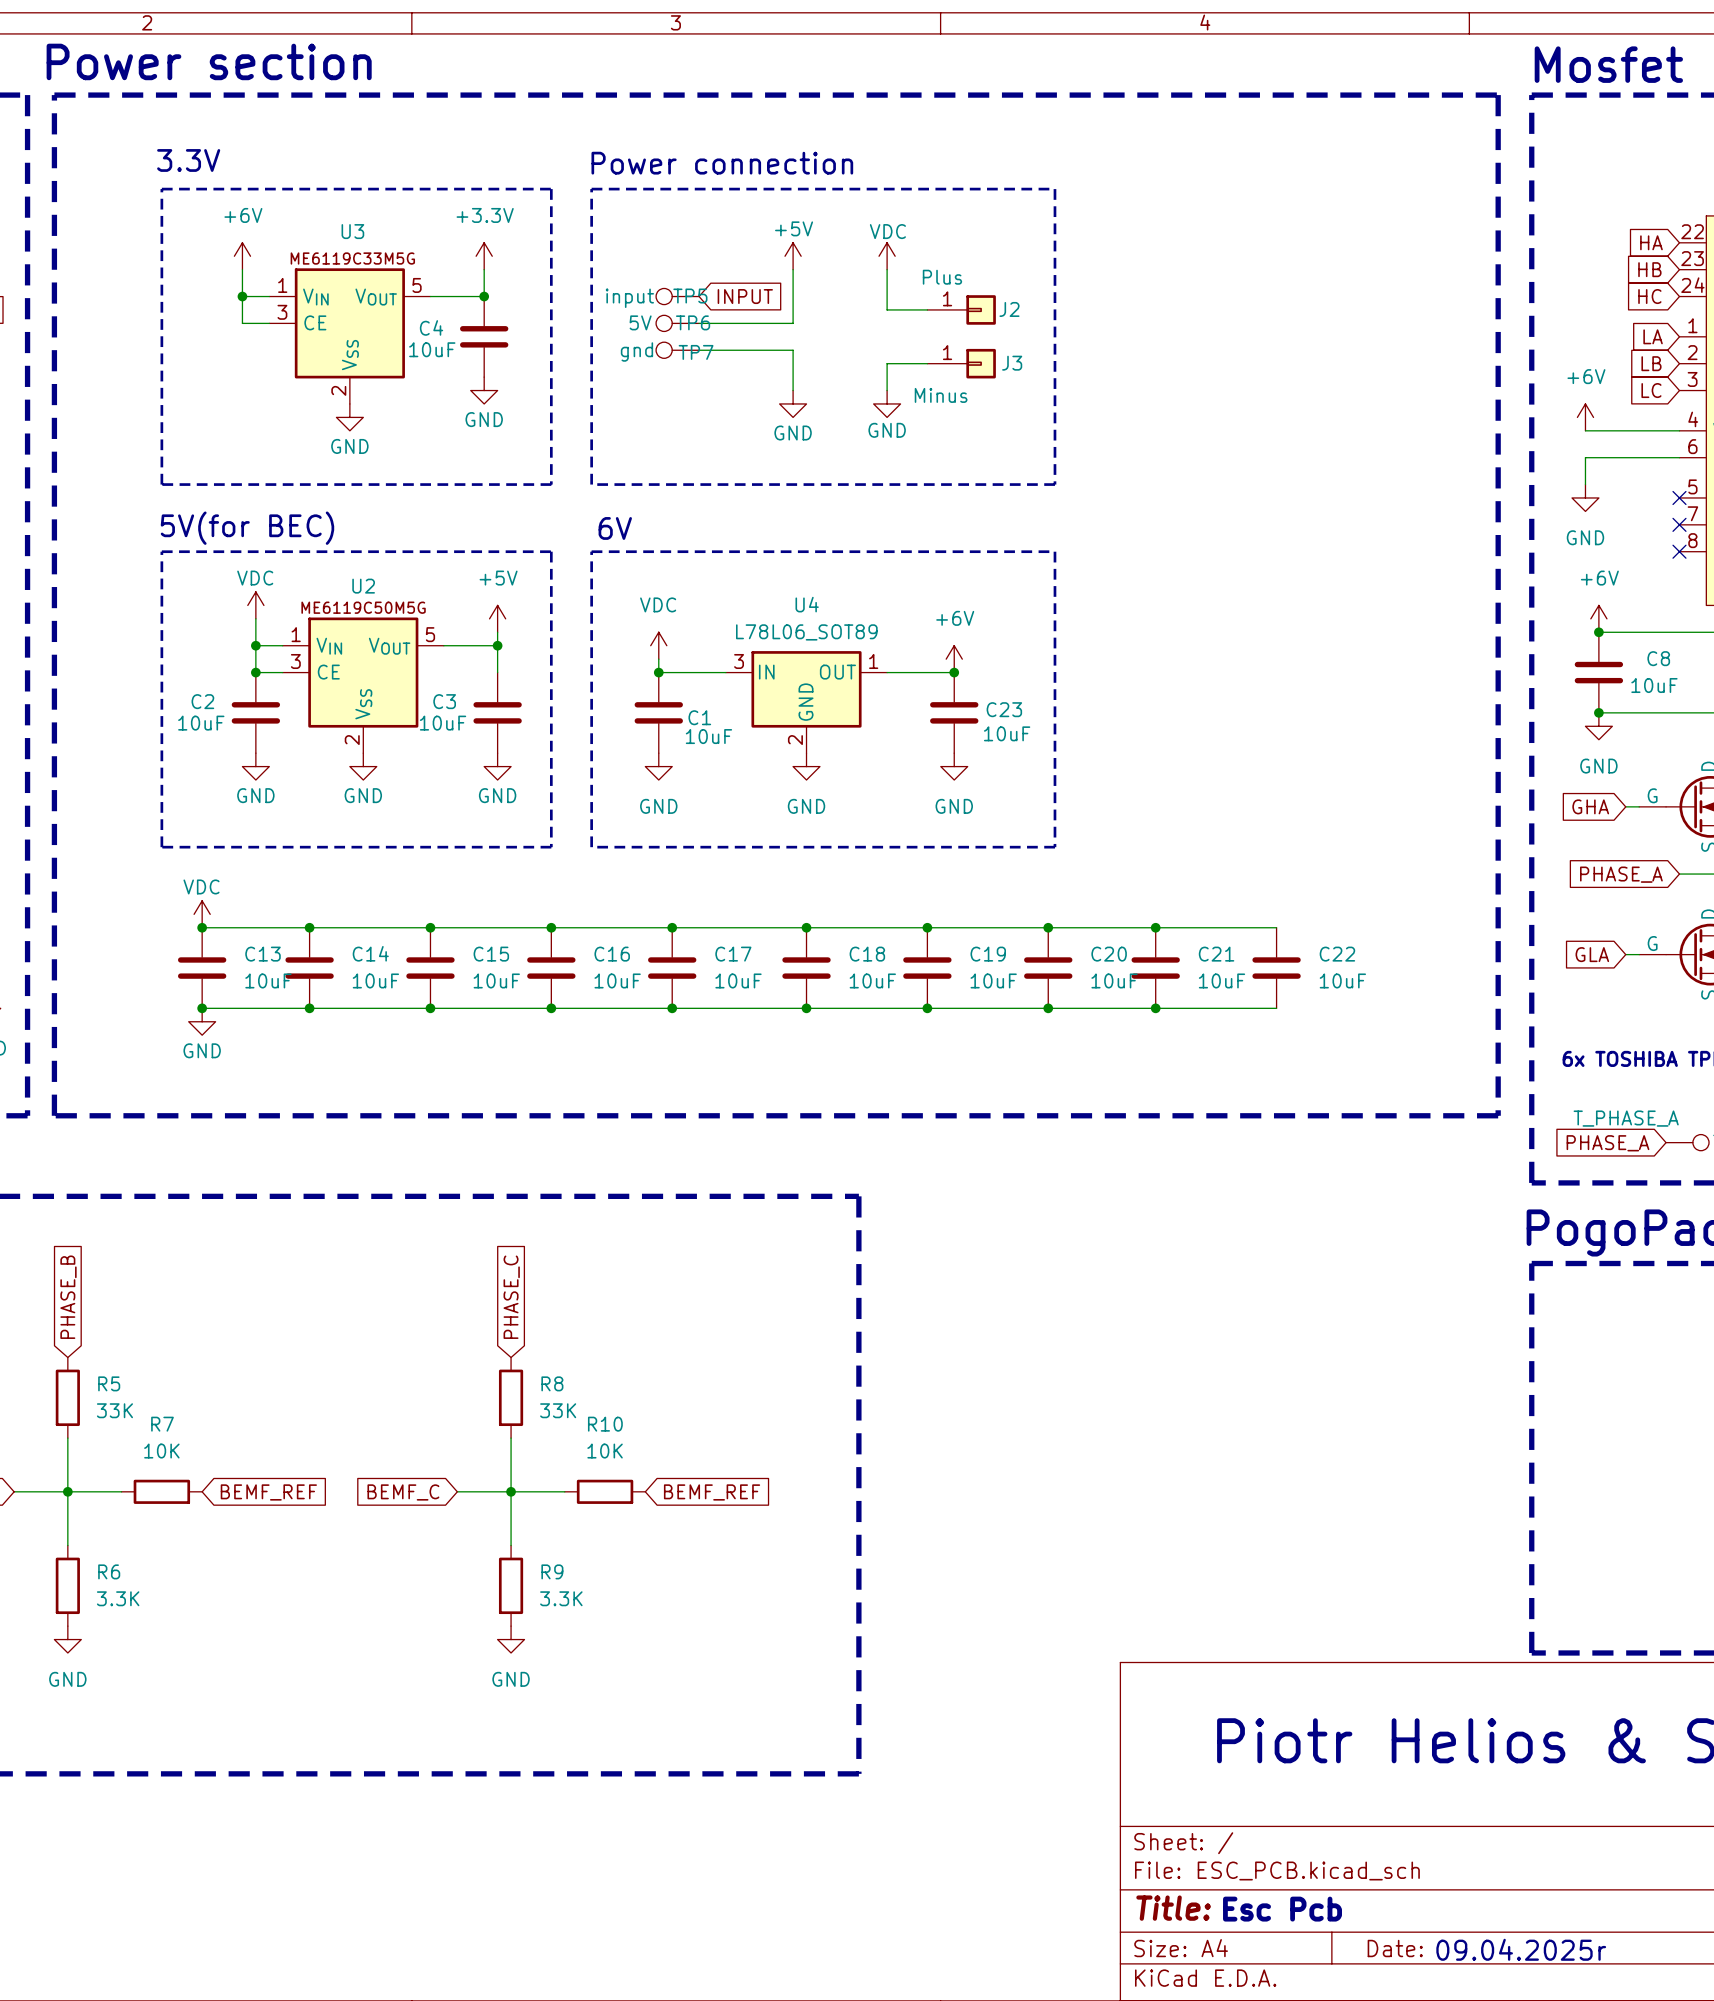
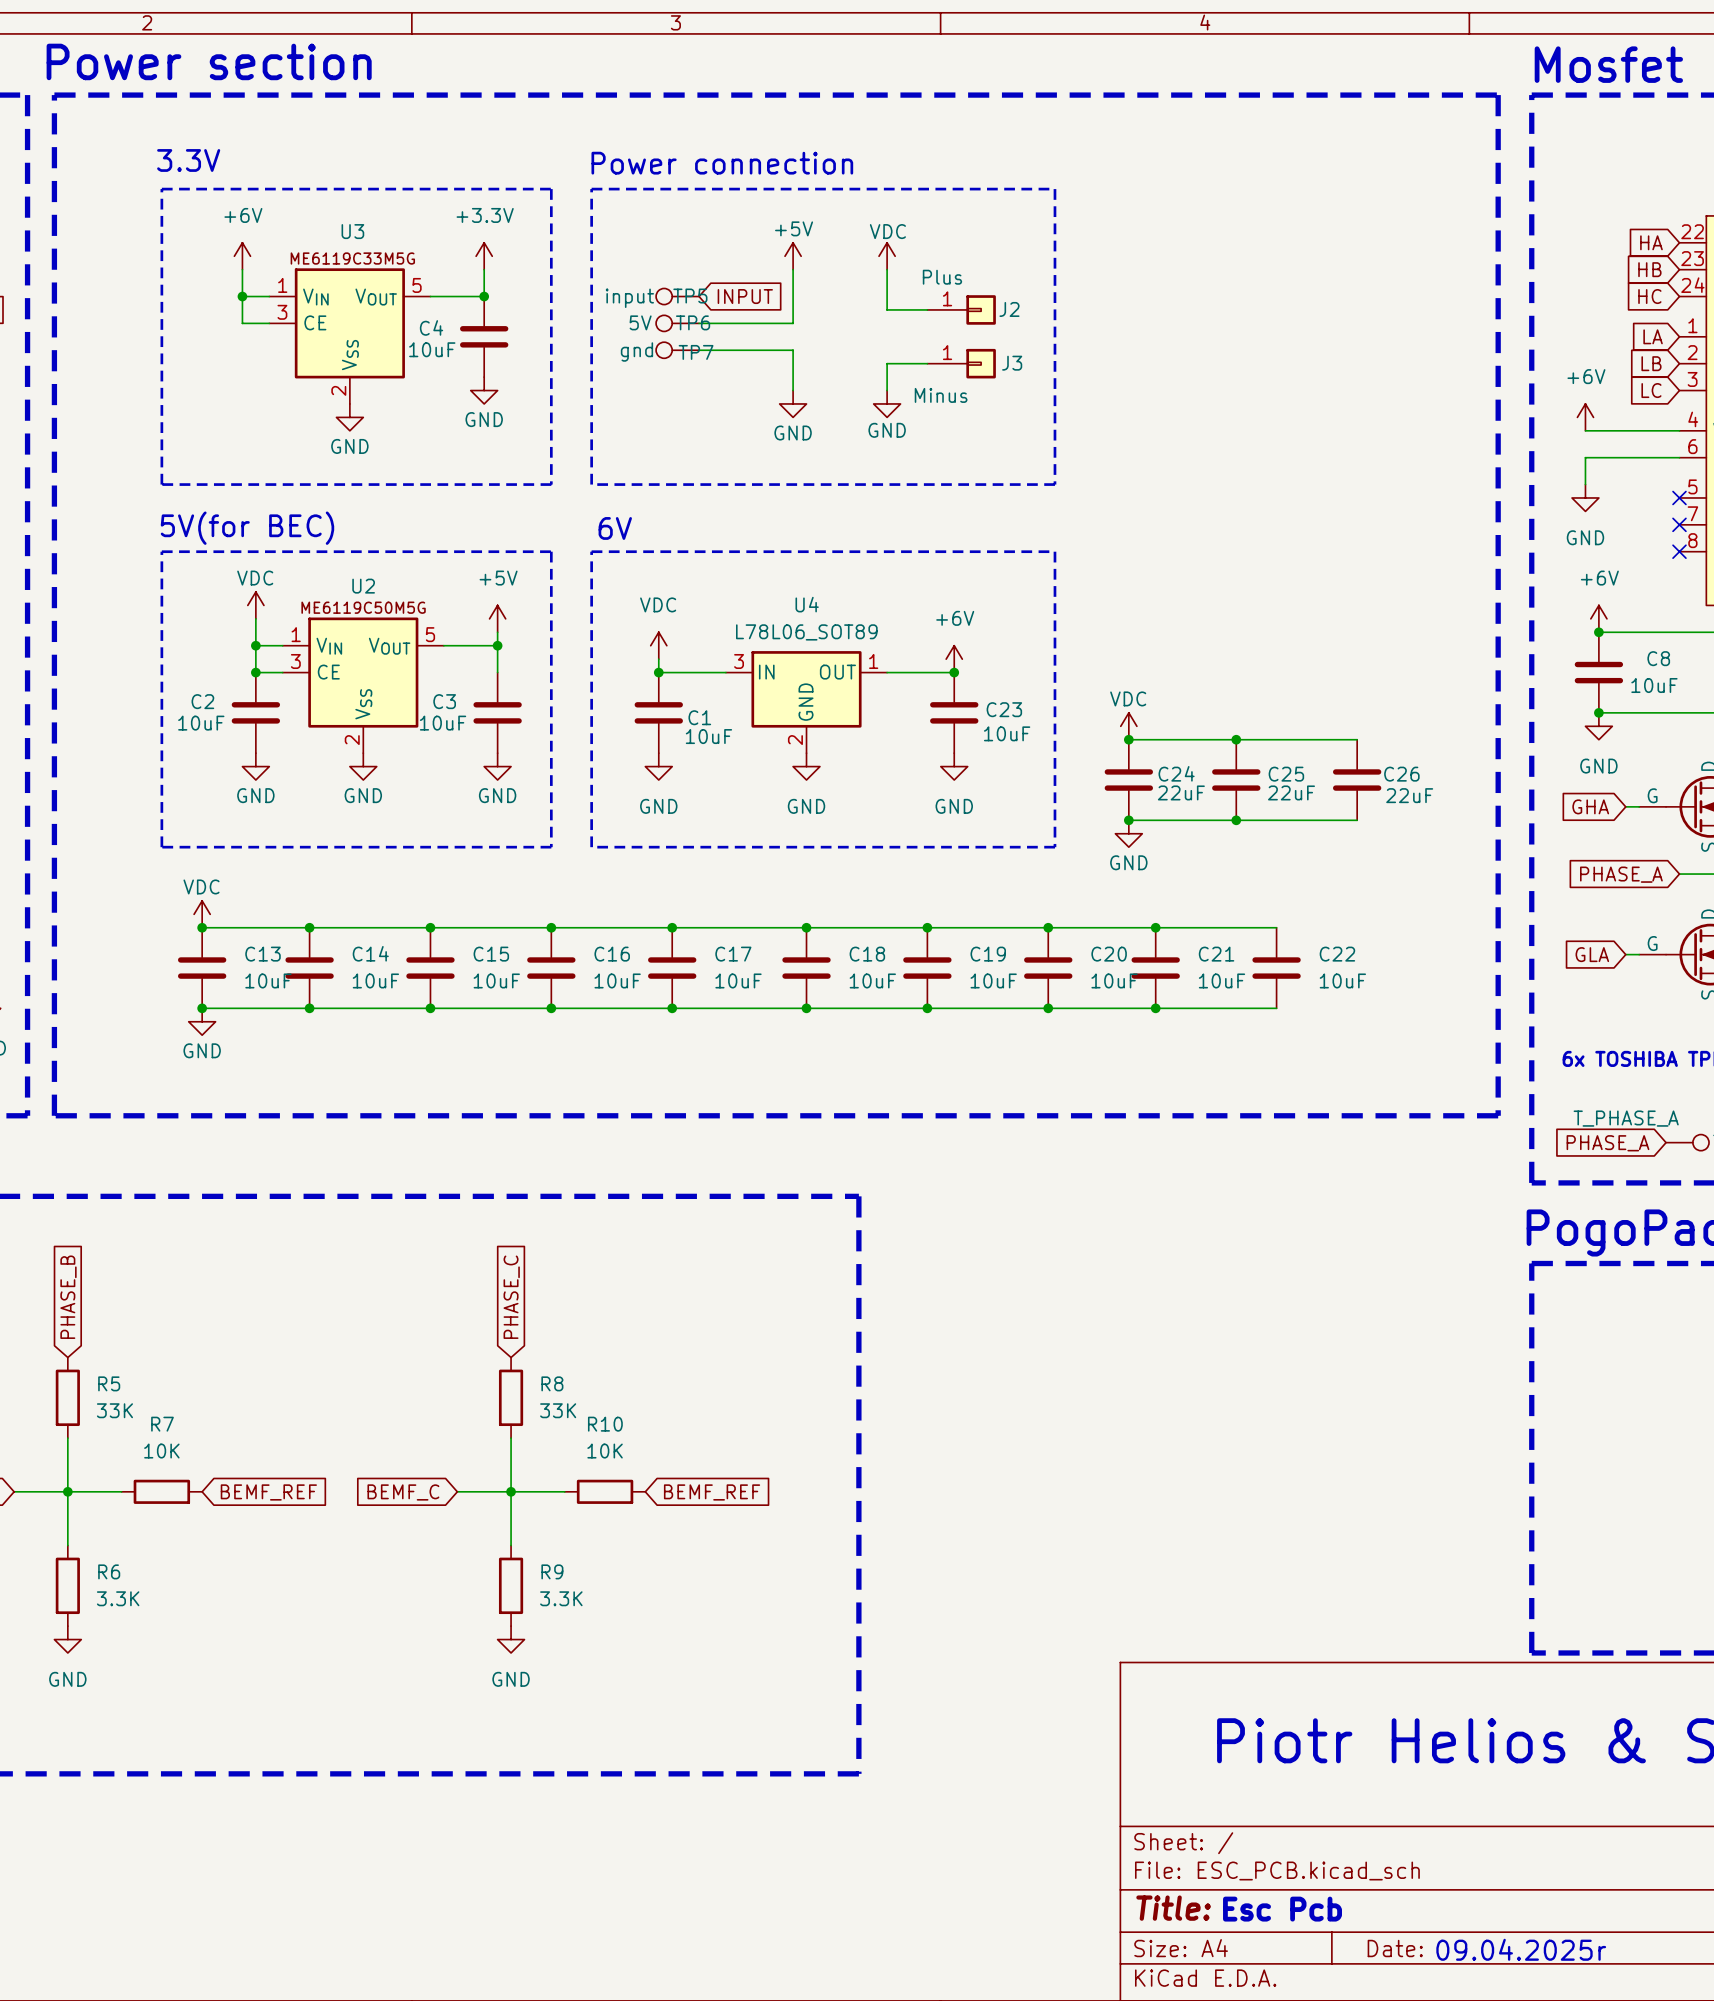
power symbol: none -> VDC (1128, 726)
wire: none -> (1128, 739) (1357, 739)
junction: none -> (1128, 739)
junction: none -> (1236, 739)
C24: none -> 22uF (1128, 780)
C25: none -> 22uF (1236, 780)
C26: none -> 22uF (1357, 780)
wire: none -> (1128, 820) (1357, 820)
junction: none -> (1128, 820)
junction: none -> (1236, 820)
power symbol: none -> GND (1128, 833)

